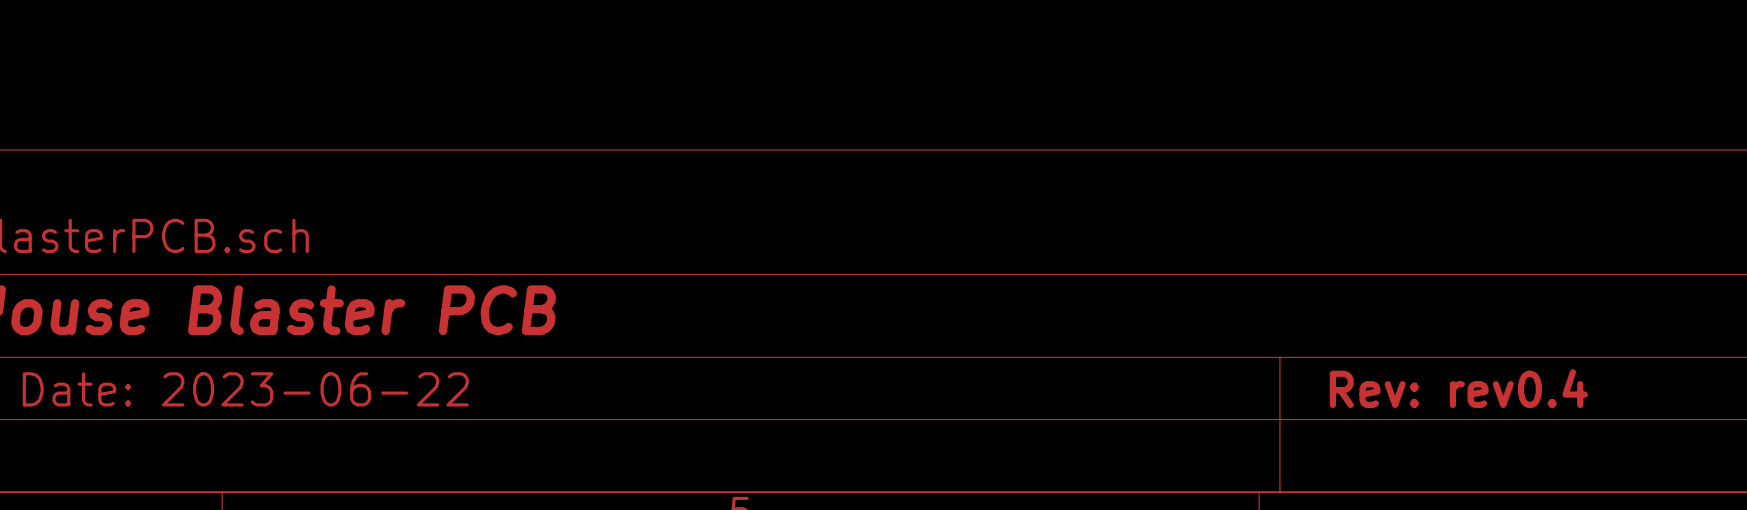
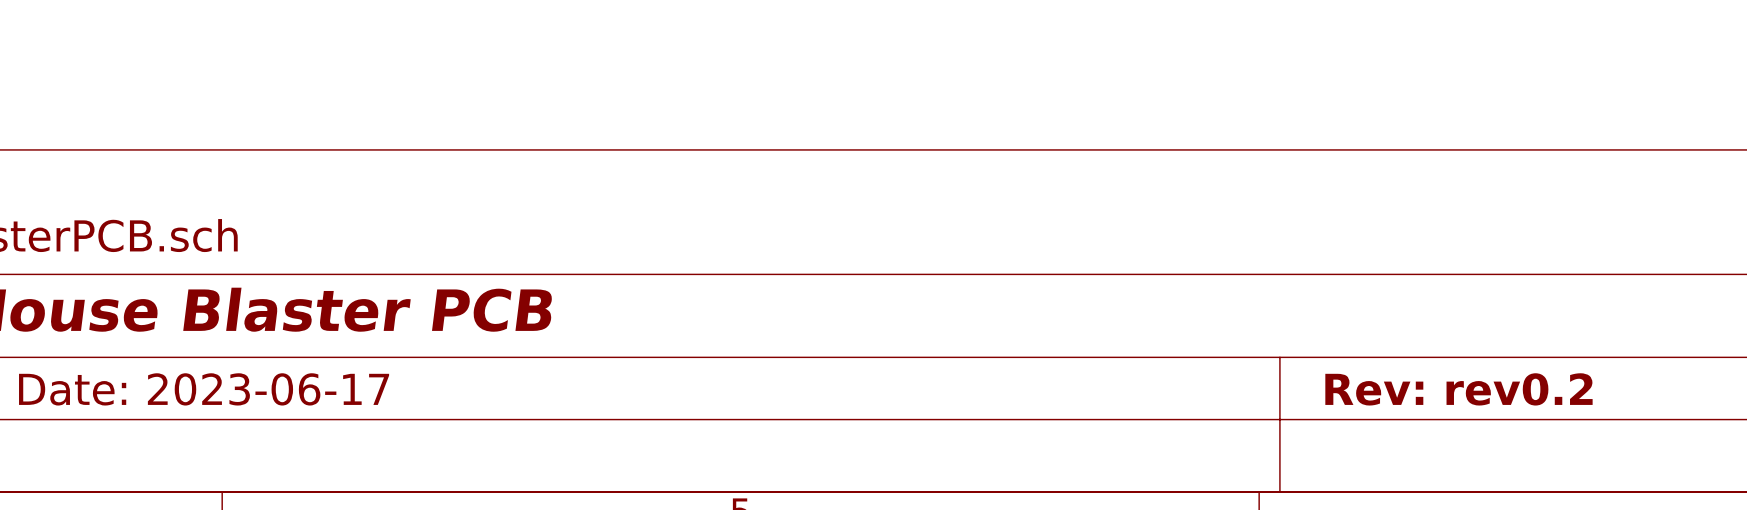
title block: Rev: rev0.4 (1458, 388) -> Rev: rev0.2 (1458, 389)
title block: Date: 2023-06-22 (245, 389) -> Date: 2023-06-17 (204, 389)

